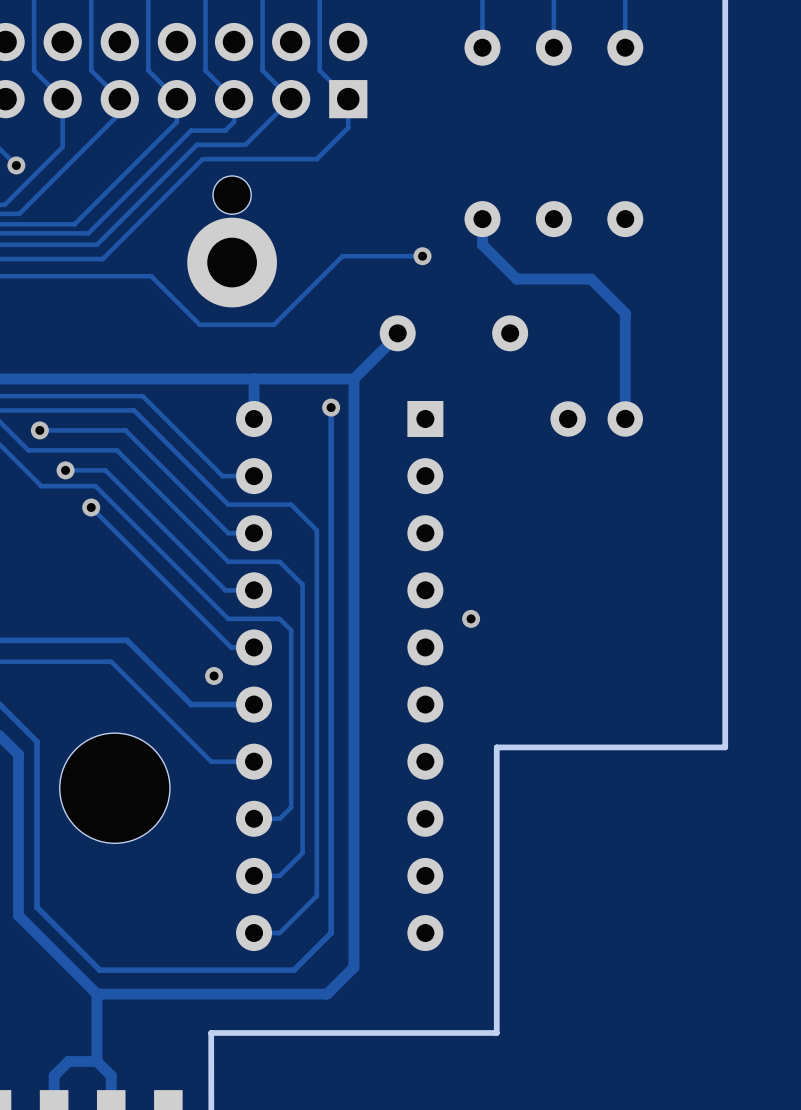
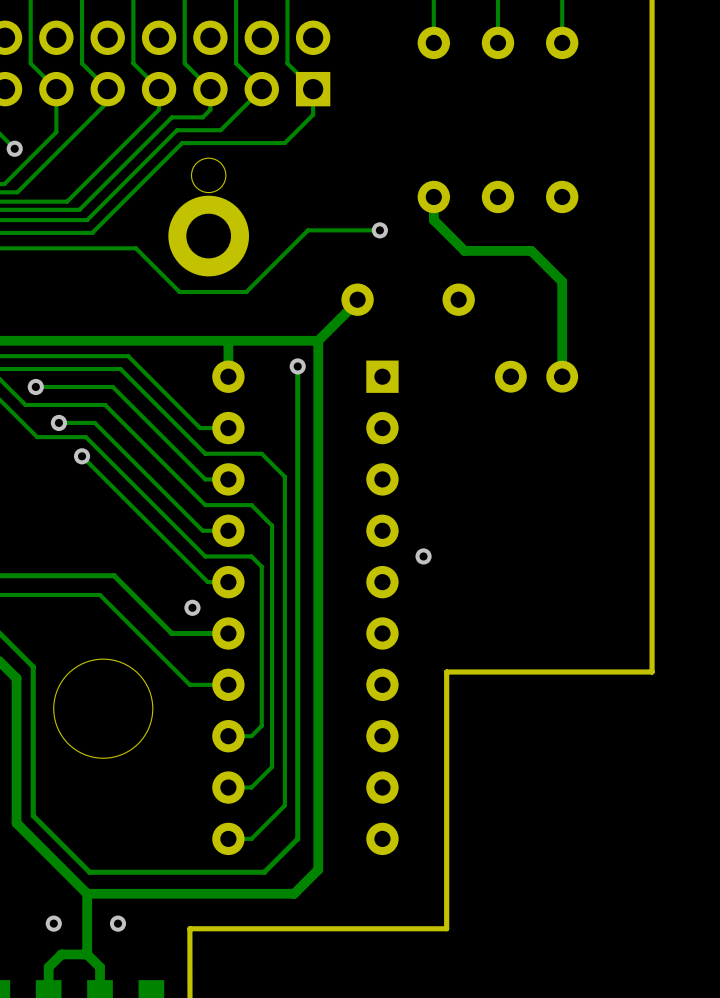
via: none -> (53, 923)
via: none -> (117, 923)

